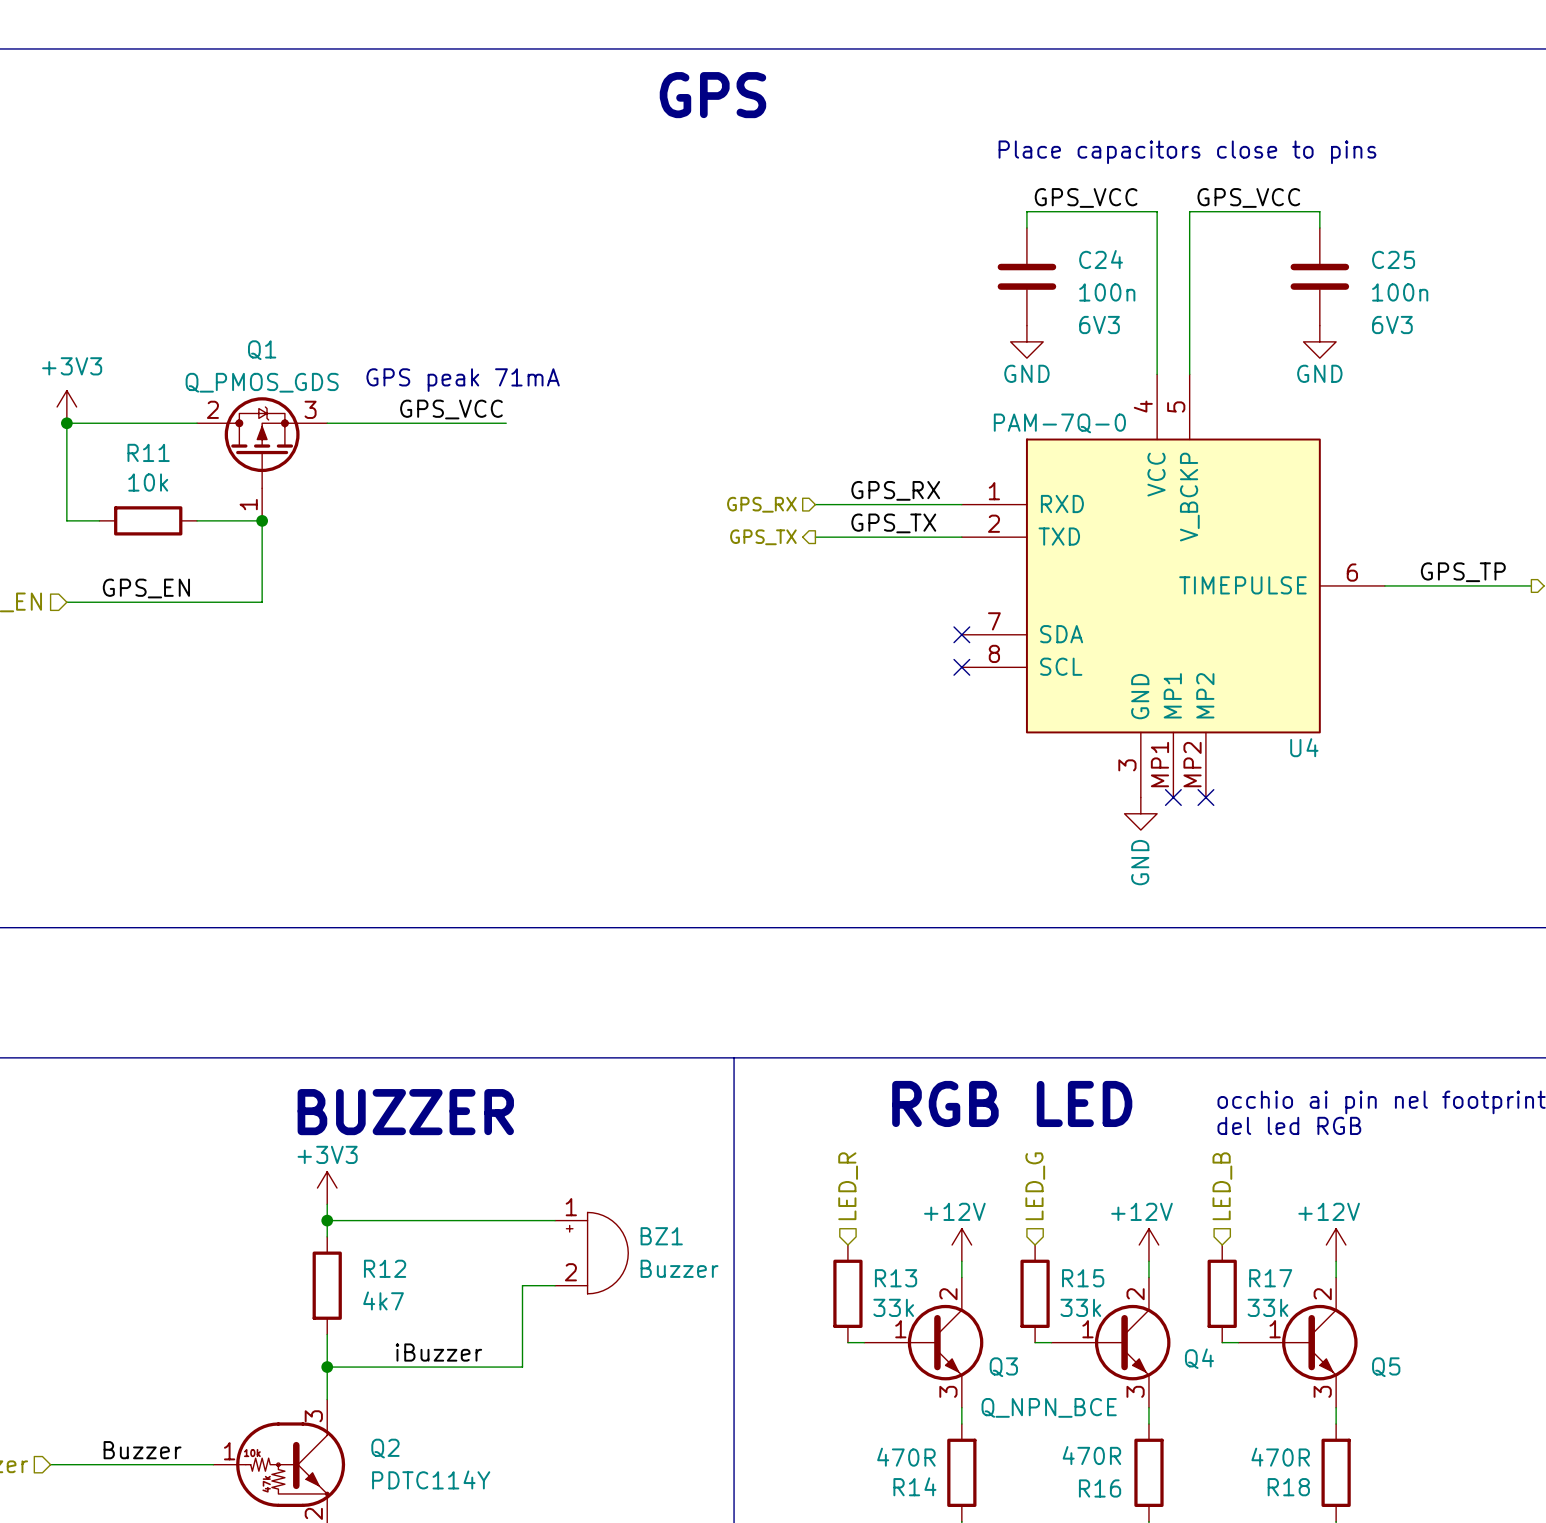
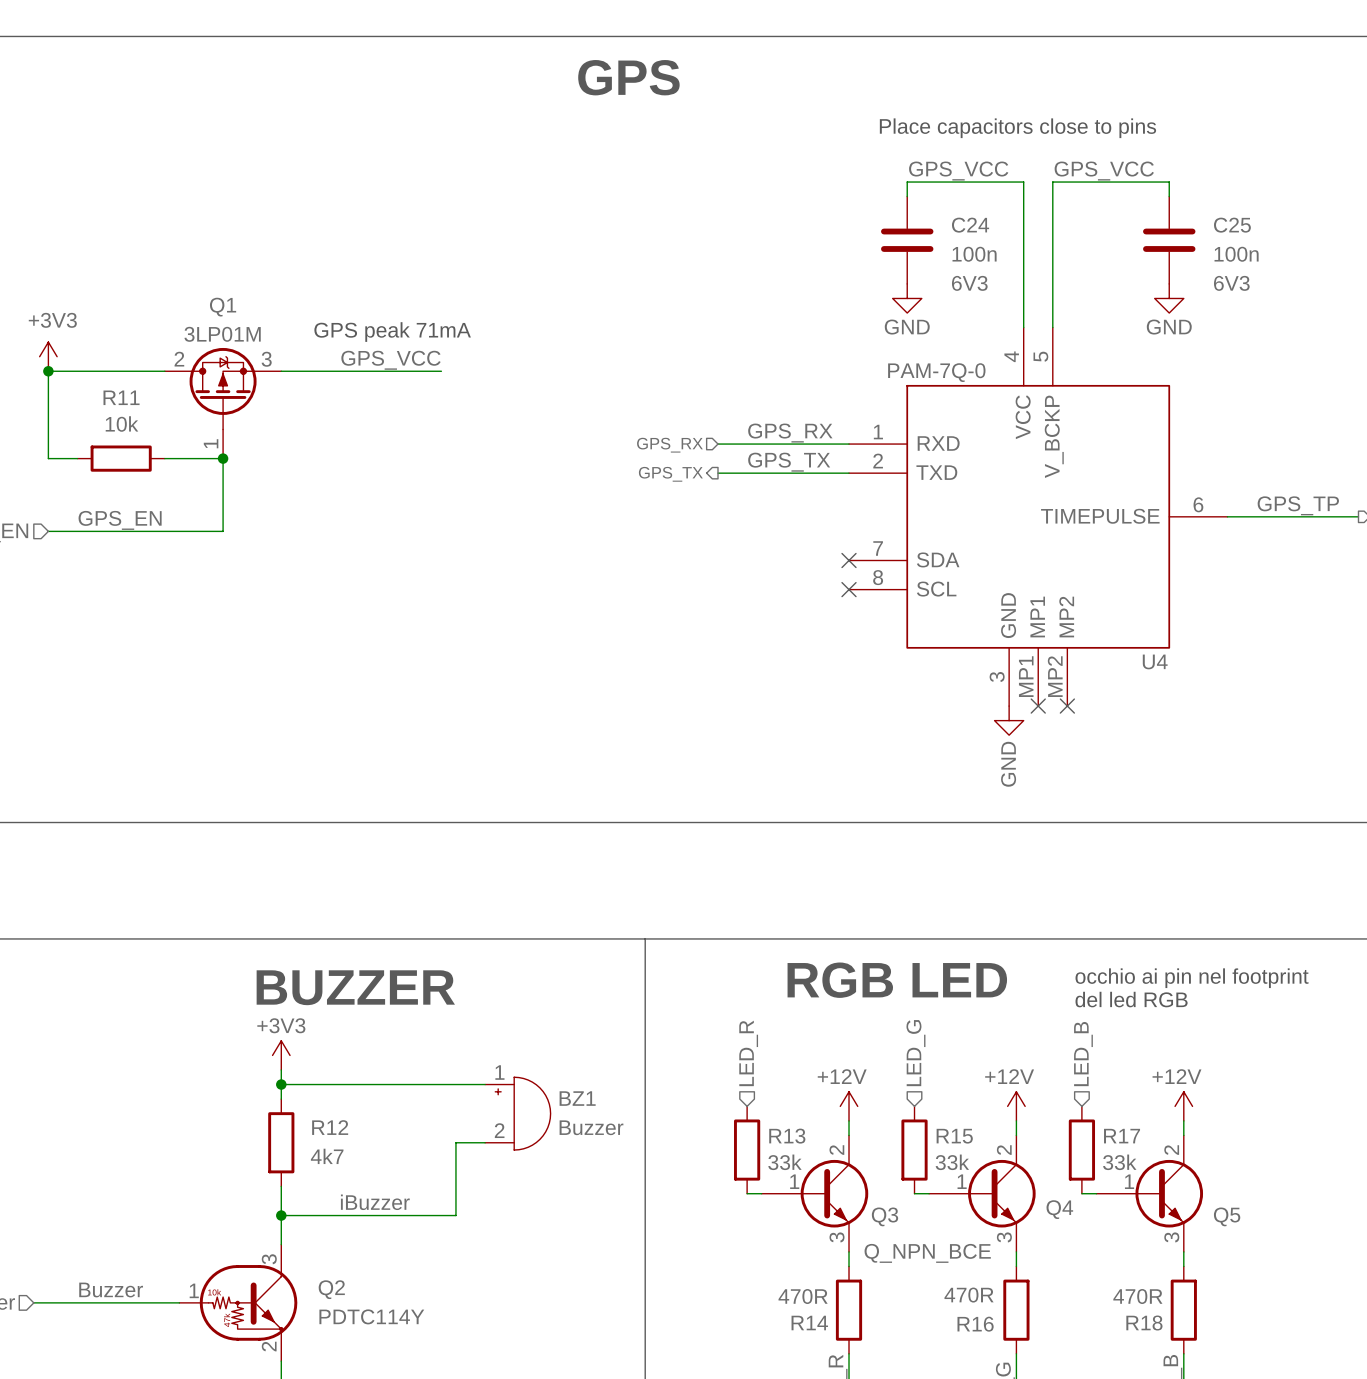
Q1 value: Q_PMOS_GDS (262, 382) -> 3LP01M (222, 334)

